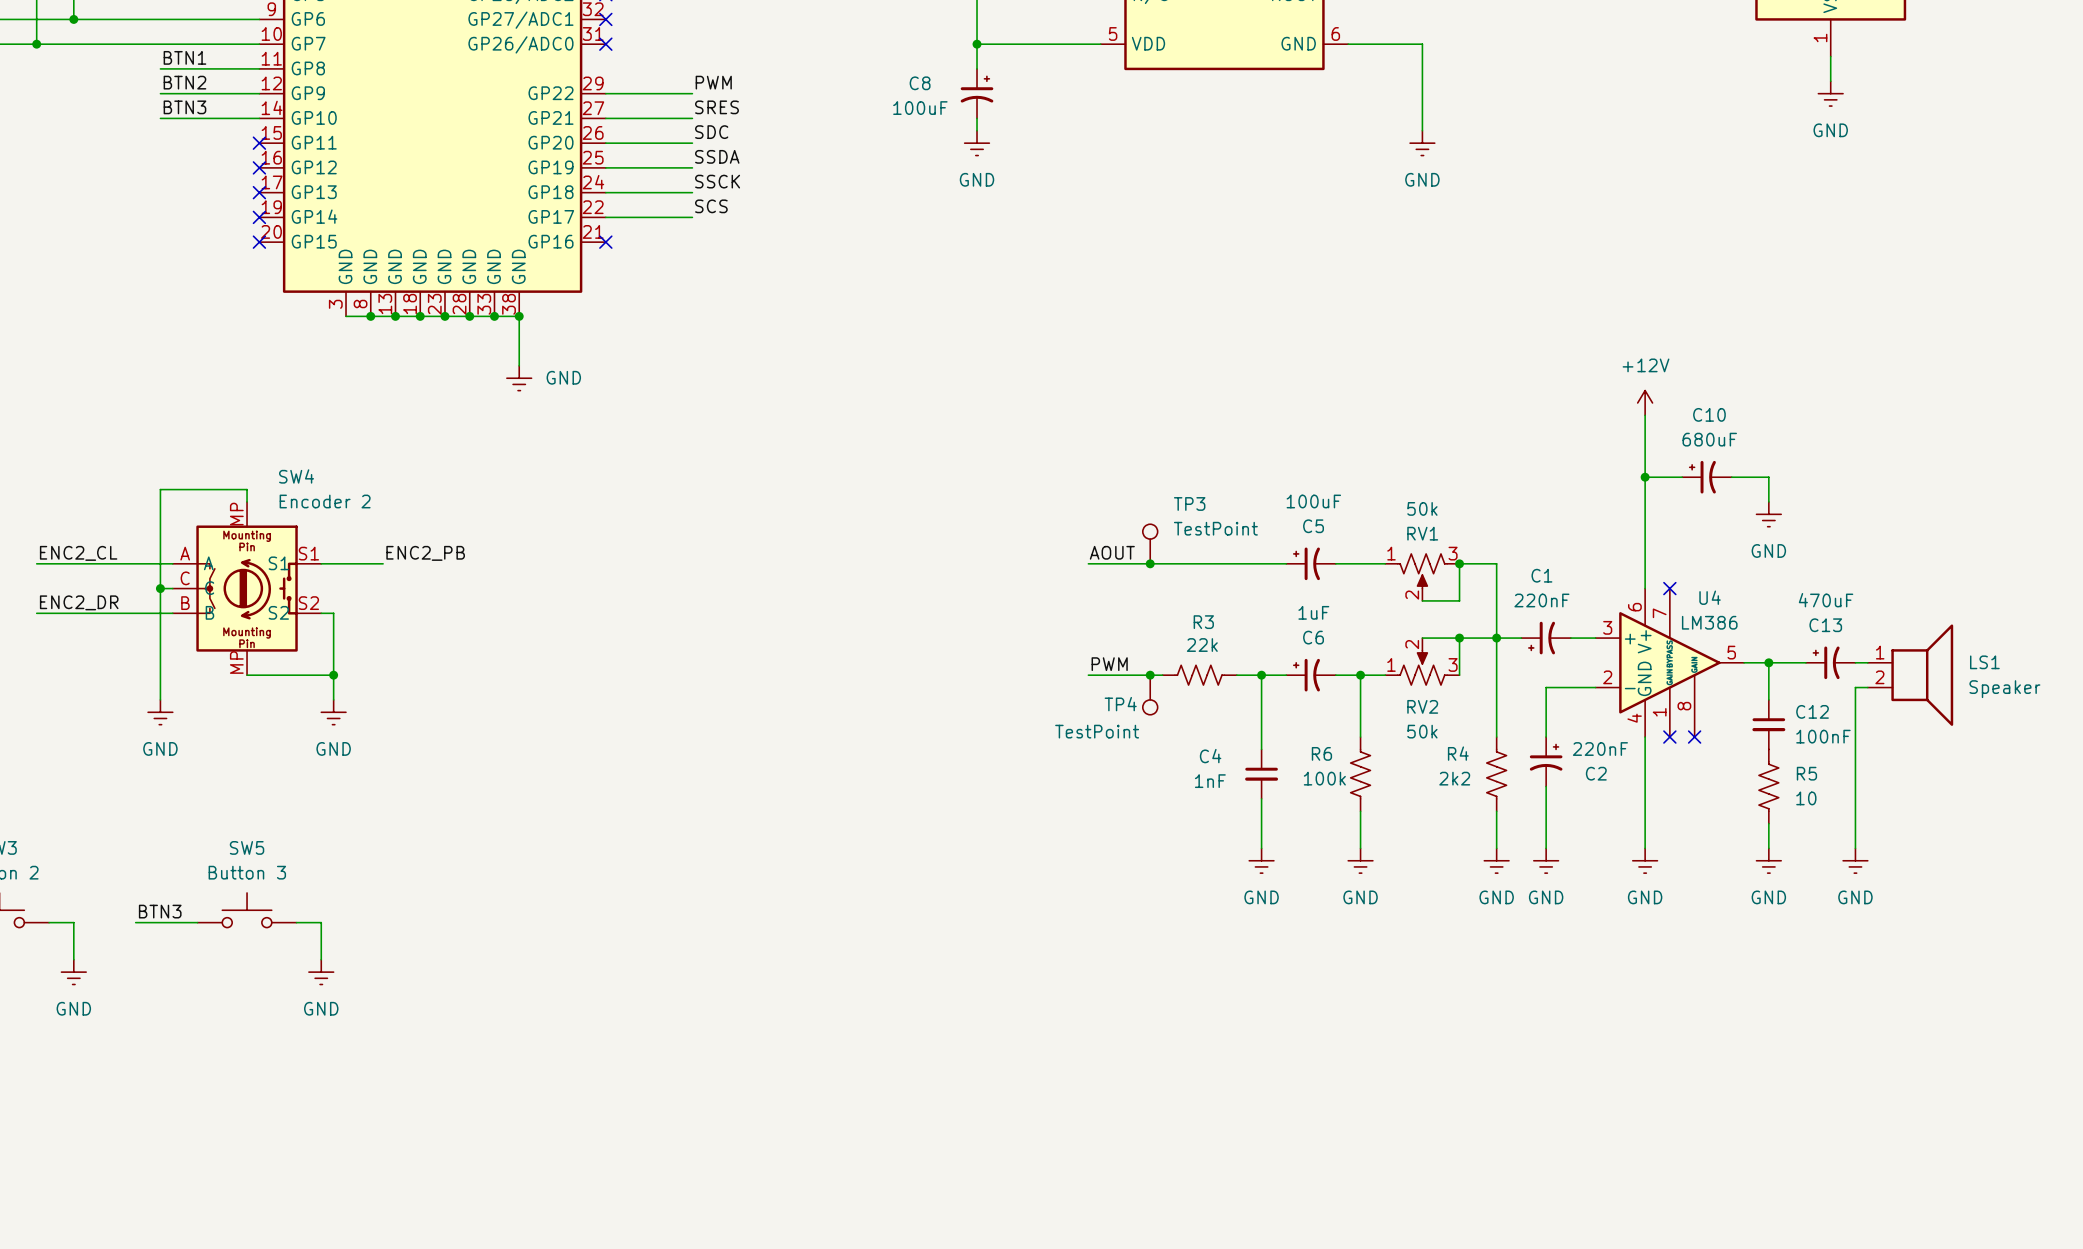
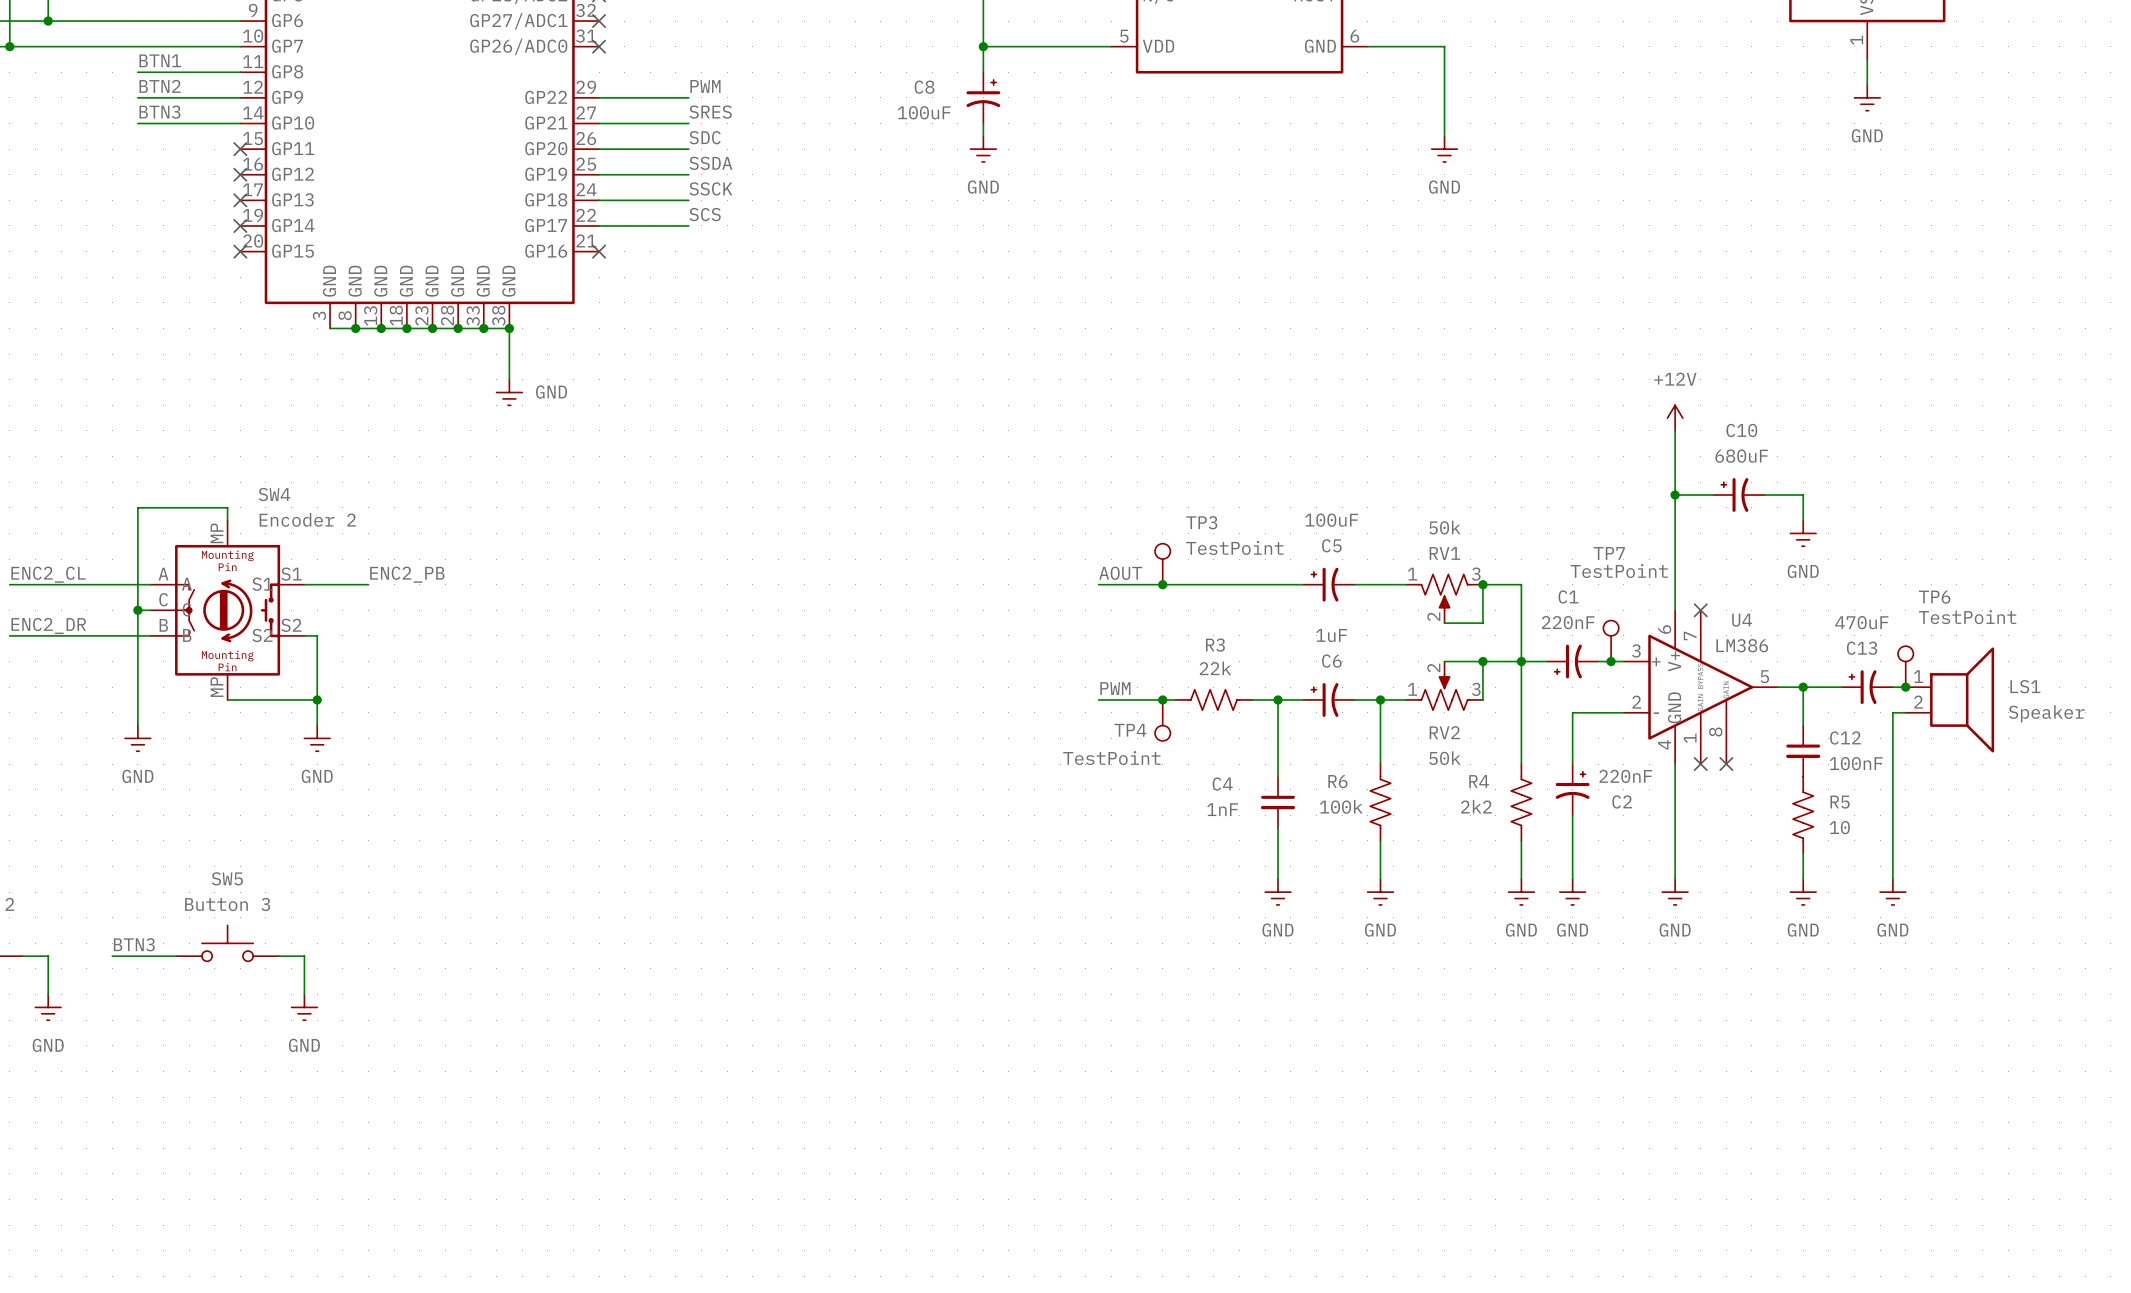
TP7: none -> TestPoint (1611, 641)
junction: none -> (1611, 661)
TP6: none -> TestPoint (1905, 666)
junction: none -> (1905, 687)

